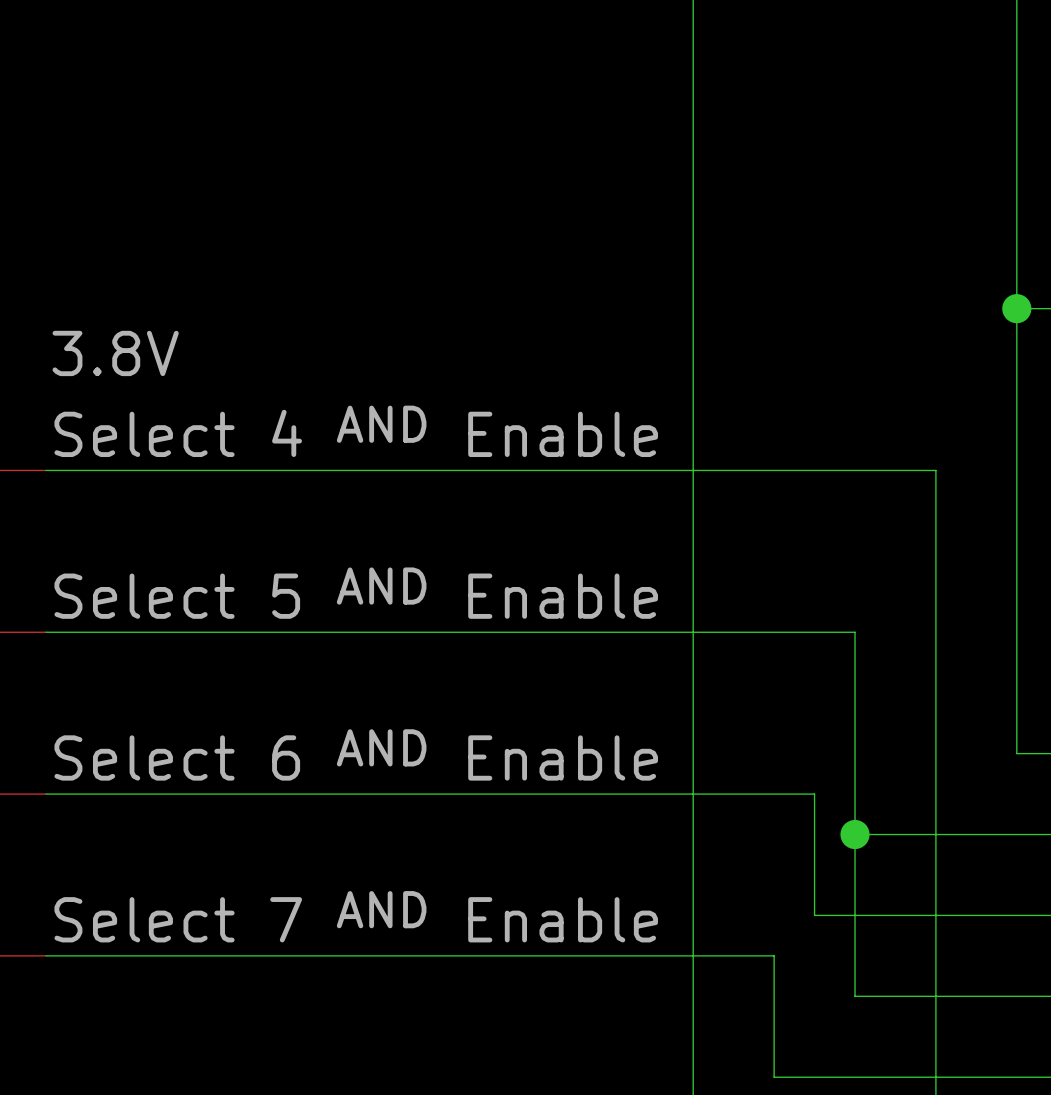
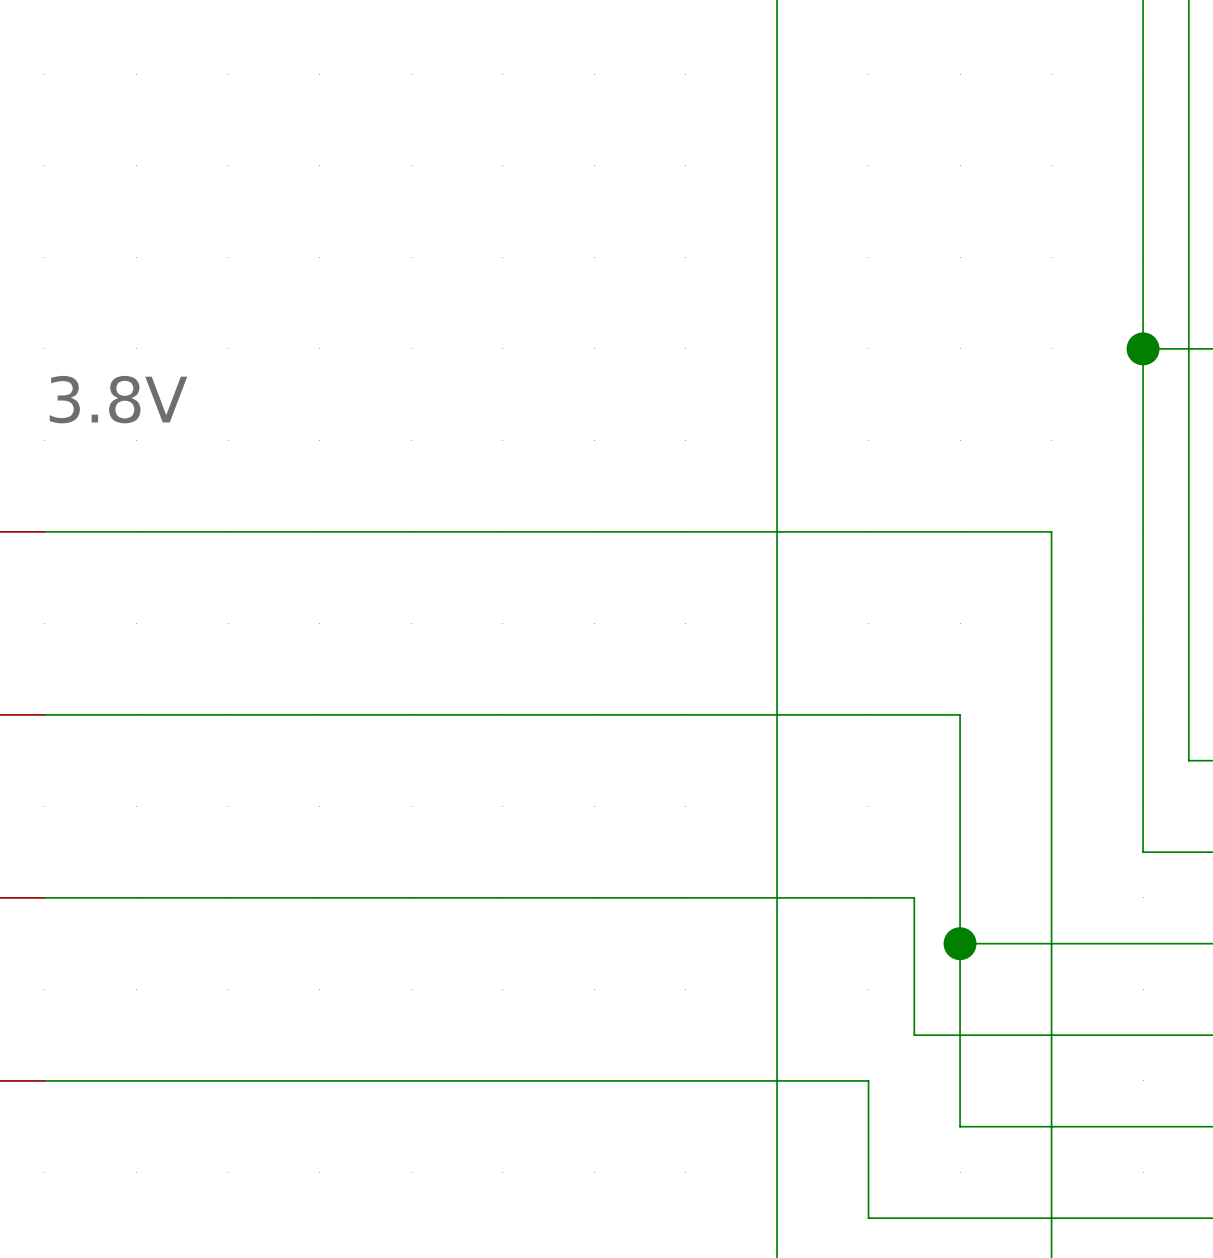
label: Select 4 AND Enable (356, 431) -> none
label: Select 5 AND Enable (356, 593) -> none
label: Select 6 AND Enable (356, 754) -> none
label: Select 7 AND Enable (356, 916) -> none

